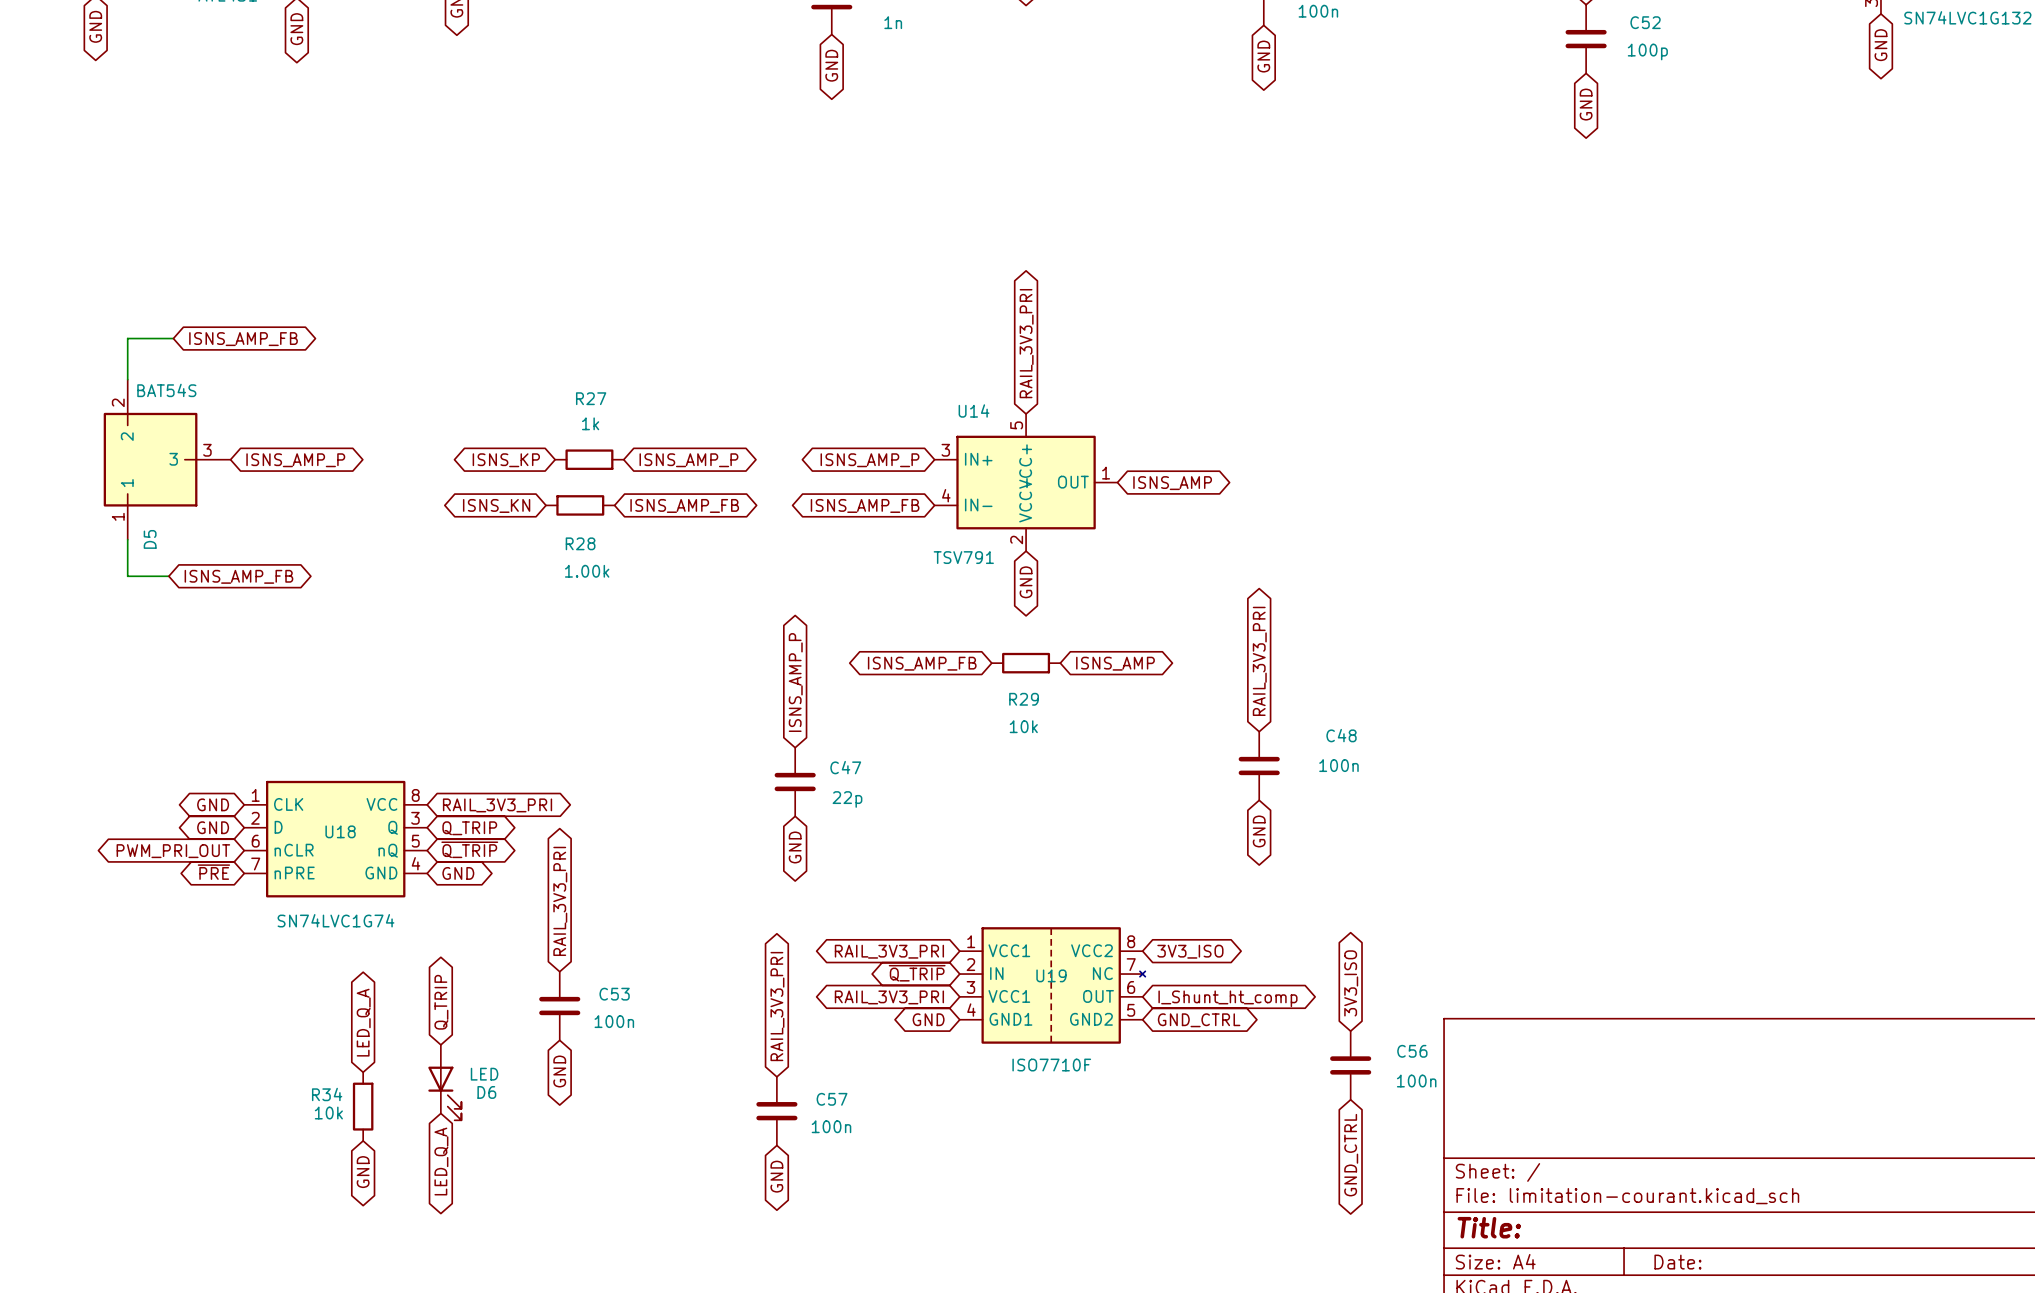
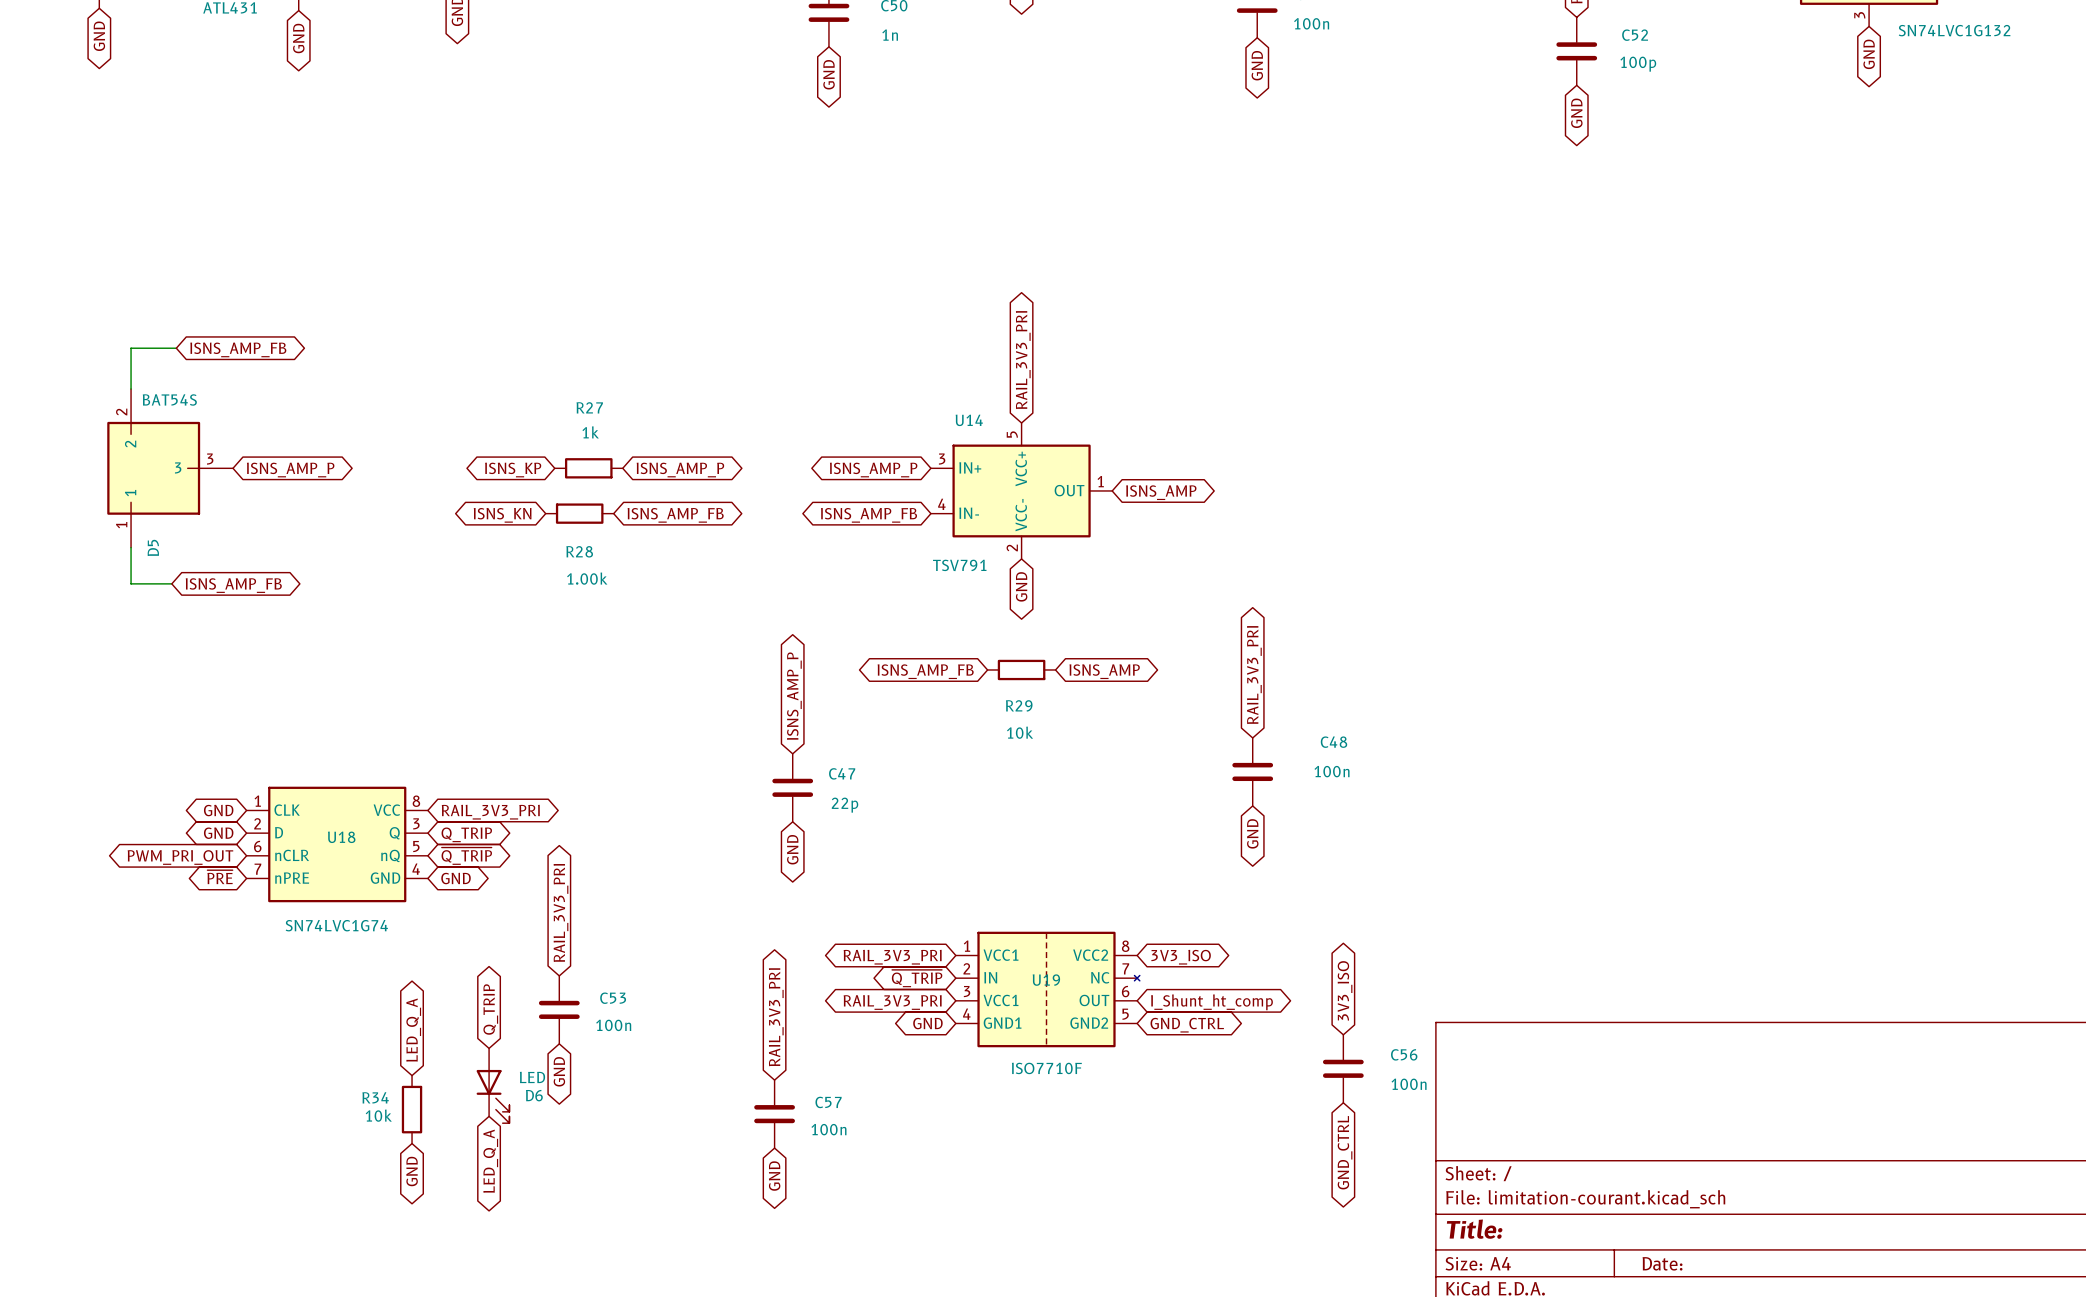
global label position: Q_TRIP (441, 1002) -> Q_TRIP (490, 1009)
global label: LED_Q_A (363, 1022) -> none
global label: none -> LED_Q_A (413, 1030)
D6 position: (444, 1082) -> (493, 1085)
R34 position: (363, 1106) -> (412, 1109)
global label: LED_Q_A (441, 1161) -> none
global label: none -> LED_Q_A (490, 1161)
global label position: GND (363, 1172) -> GND (412, 1171)

